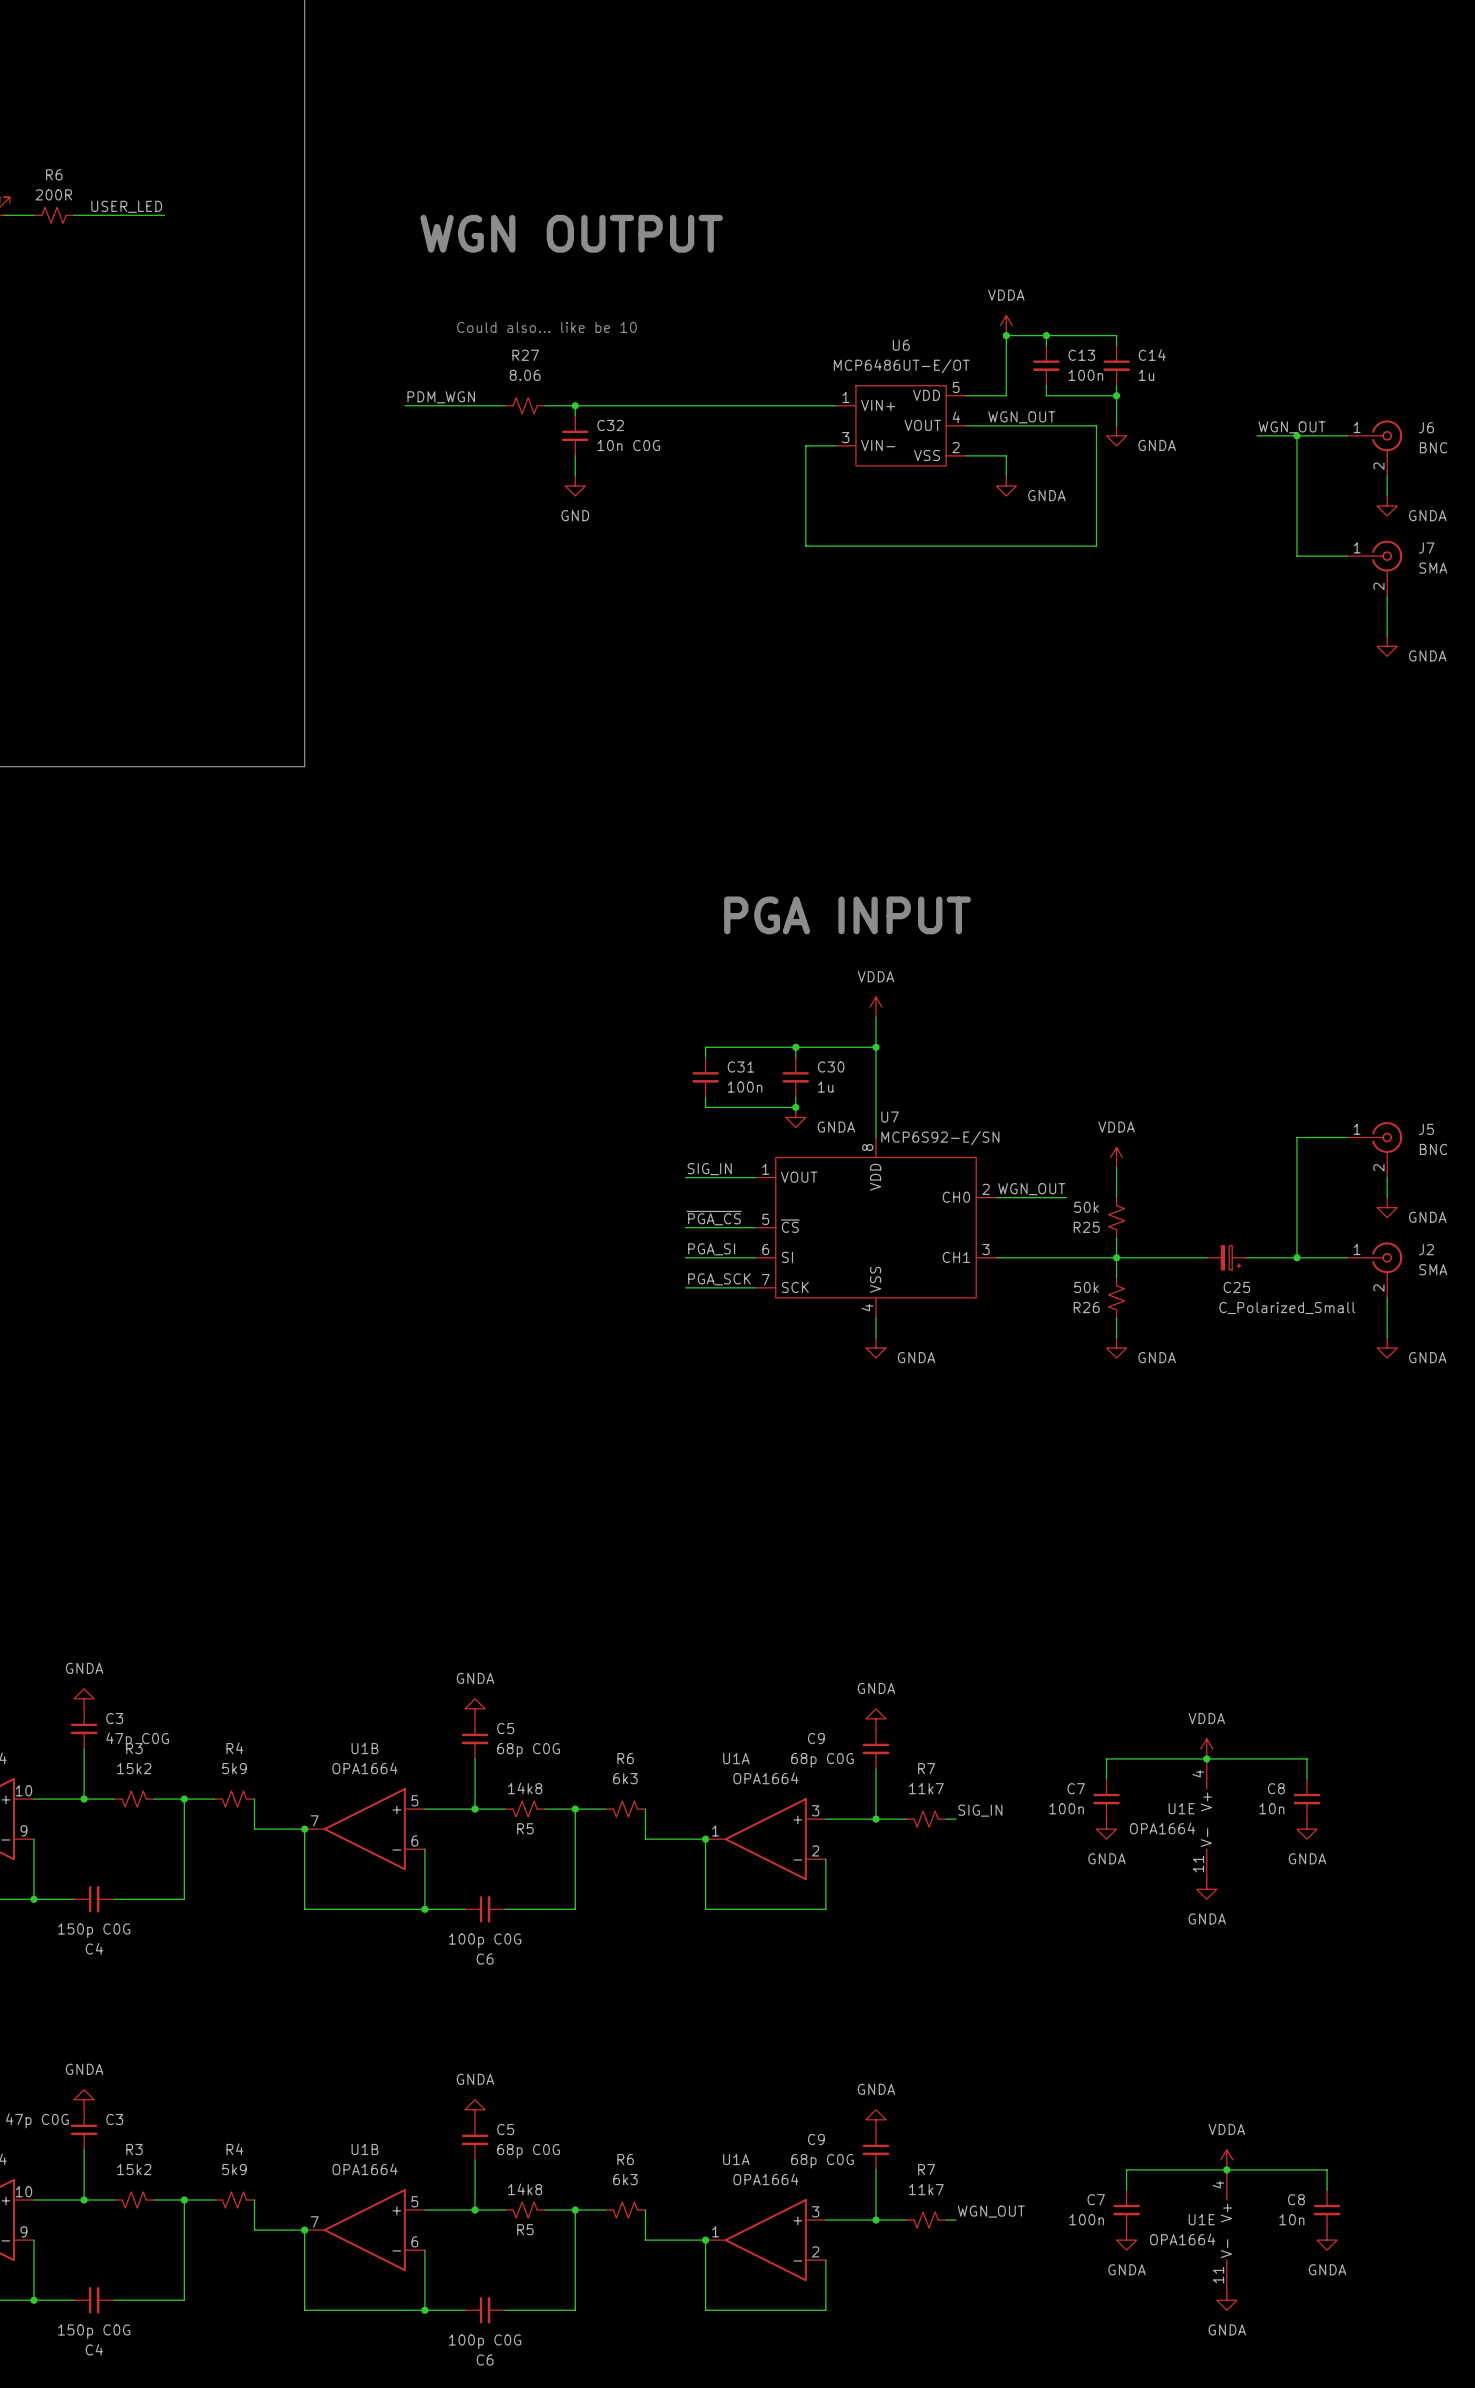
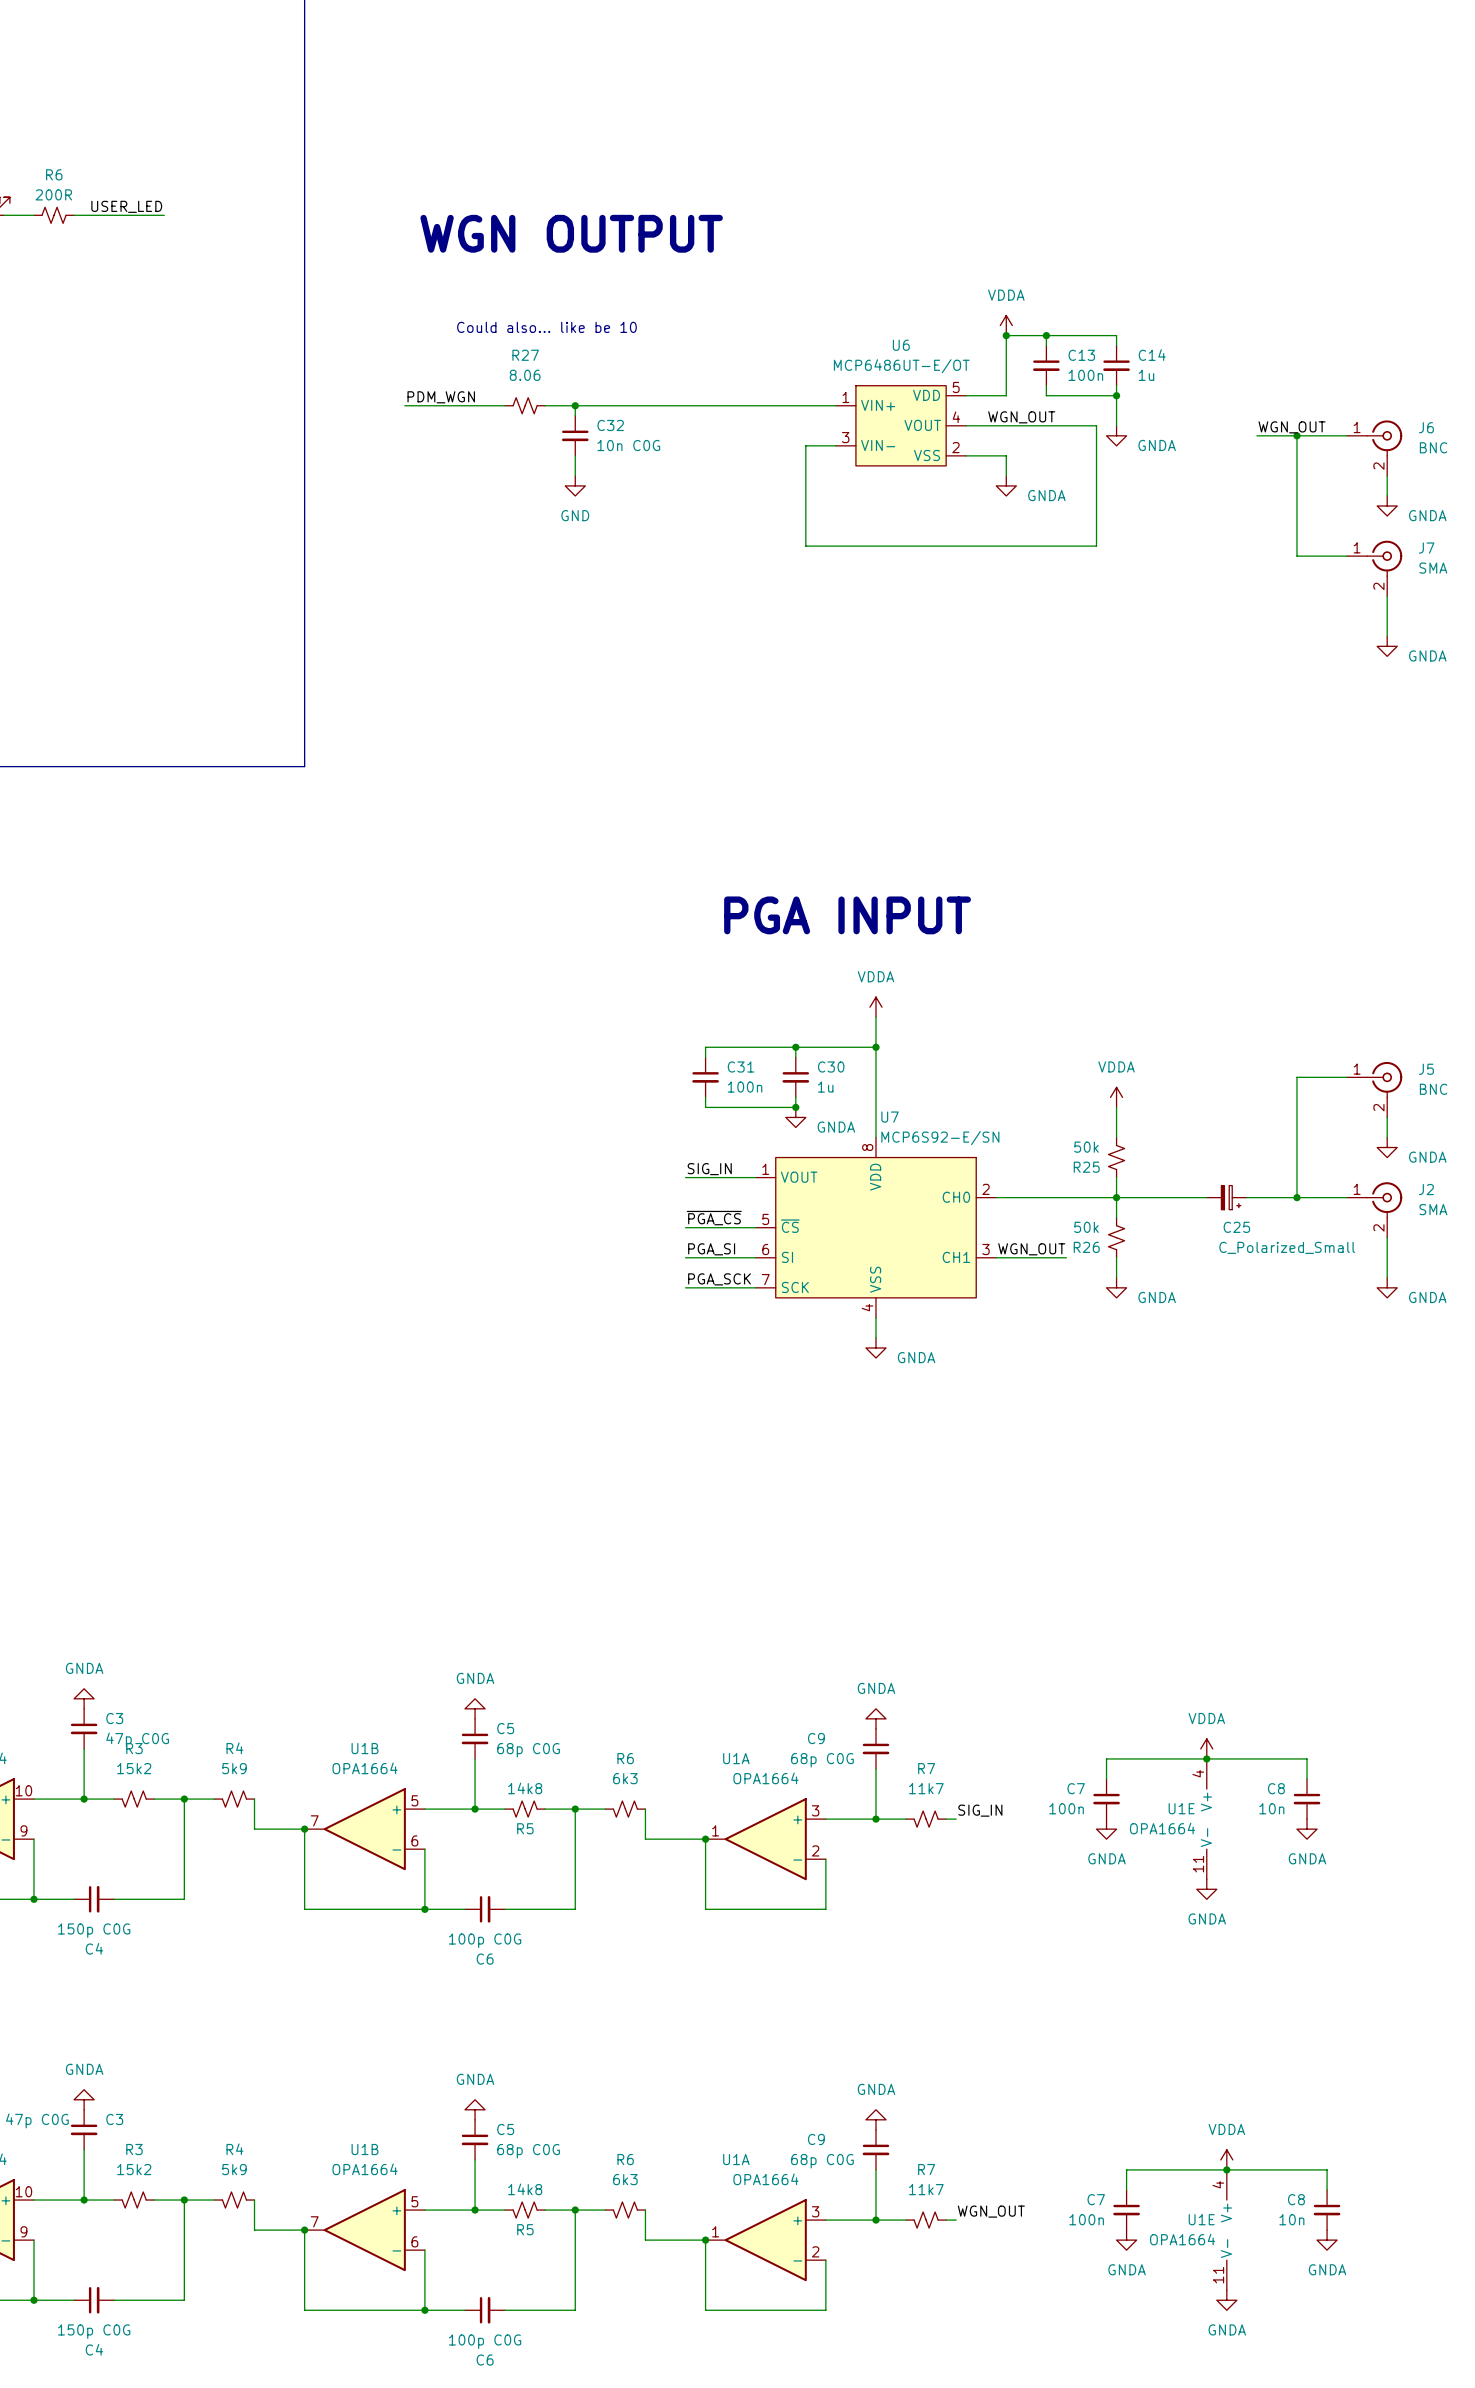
wire: none -> (1116, 1107) (1116, 1137)
wire: (1296, 1137) (1347, 1137) -> (1296, 1137) (1296, 1077) (1347, 1077)
power symbol: none -> GNDA (1387, 1147)
J5 position: (1374, 1149) -> (1374, 1089)
power symbol position: VDDA (1116, 1157) -> VDDA (1116, 1097)
wire: (1387, 1177) (1387, 1197) -> (1387, 1117) (1387, 1137)
label position: WGN_OUT (1031, 1189) -> WGN_OUT (1031, 1249)
junction: none -> (1116, 1197)
wire: (1296, 1197) (1296, 1257) -> none
junction: none -> (1296, 1197)
power symbol: GNDA (1387, 1207) -> none
R25 position: (1116, 1217) -> (1116, 1157)
wire: (1066, 1257) (1206, 1257) -> (1066, 1197) (1206, 1197)
junction: (1116, 1257) -> none
C25 position: (1226, 1257) -> (1226, 1197)
wire: (1246, 1257) (1347, 1257) -> (1246, 1197) (1347, 1197)
junction: (1296, 1257) -> none
J2 position: (1374, 1270) -> (1374, 1209)
power symbol: none -> GNDA (1387, 1287)
R26 position: (1116, 1297) -> (1116, 1237)
wire: (1387, 1297) (1387, 1337) -> (1387, 1237) (1387, 1277)
wire: (1116, 1317) (1116, 1337) -> none
power symbol position: GNDA (1116, 1347) -> GNDA (1116, 1287)
power symbol: GNDA (1387, 1347) -> none

